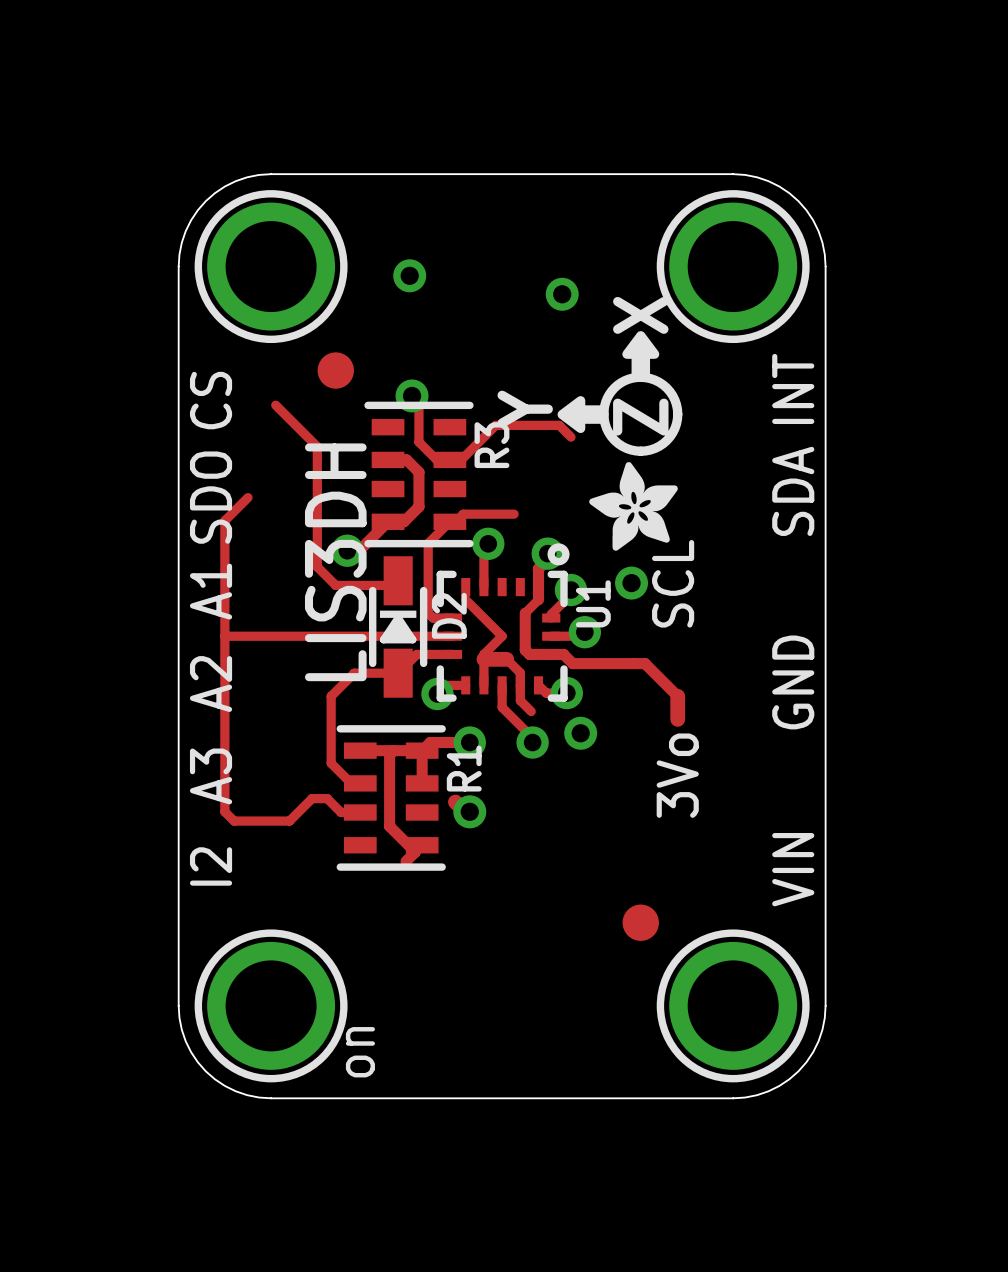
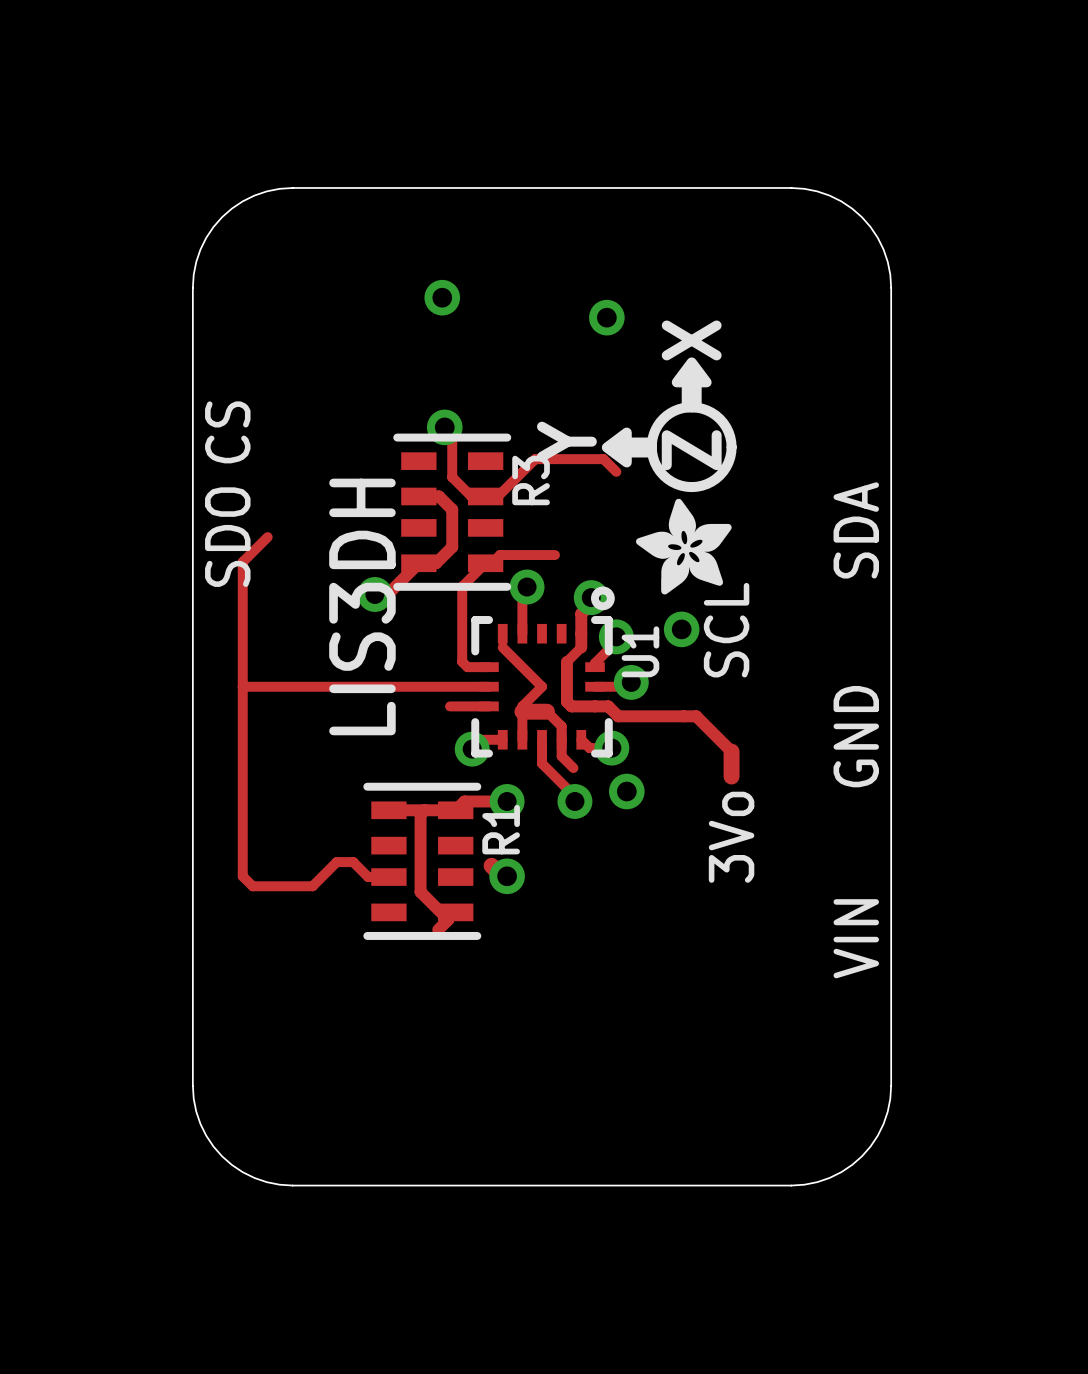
part: (271, 266) -> none
part: (733, 266) -> none
part: (335, 370) -> none
text: INT (793, 388) -> none
track: (275, 405) (317, 446) (317, 566) (335, 585) (393, 585) (398, 580) -> none
text: A1 (211, 591) -> none
D2: (398, 626) -> none
track: (416, 654) (398, 673) (354, 673) (331, 696) (331, 763) (351, 783) (360, 783) -> none
text: A2 (211, 684) -> none
track: (422, 750) (422, 783) -> none
text: A3 (211, 776) -> none
text: I2 (211, 866) -> none
part: (640, 922) -> none
part: (271, 1005) -> none
part: (733, 1005) -> none
text: on (360, 1052) -> none

